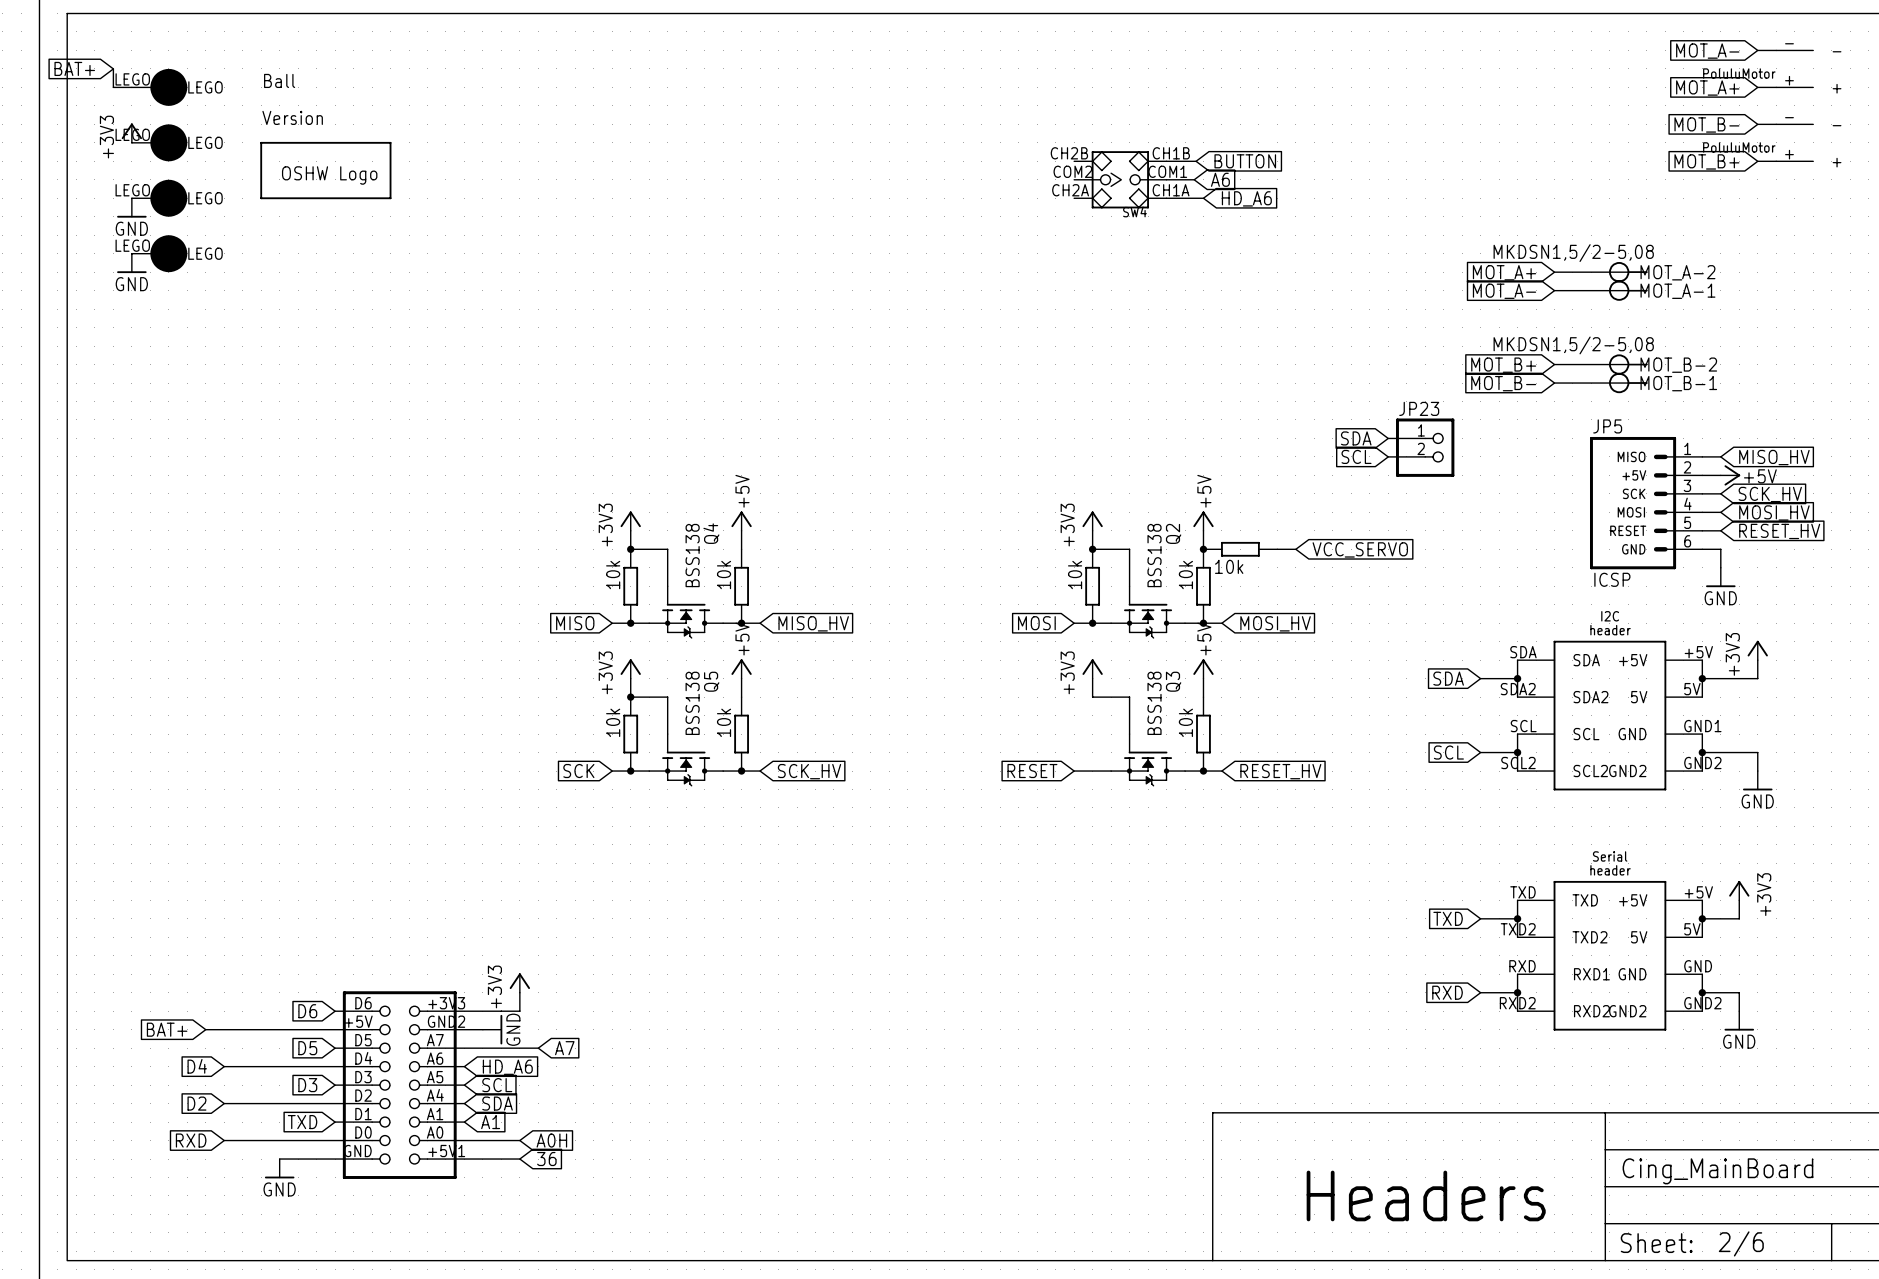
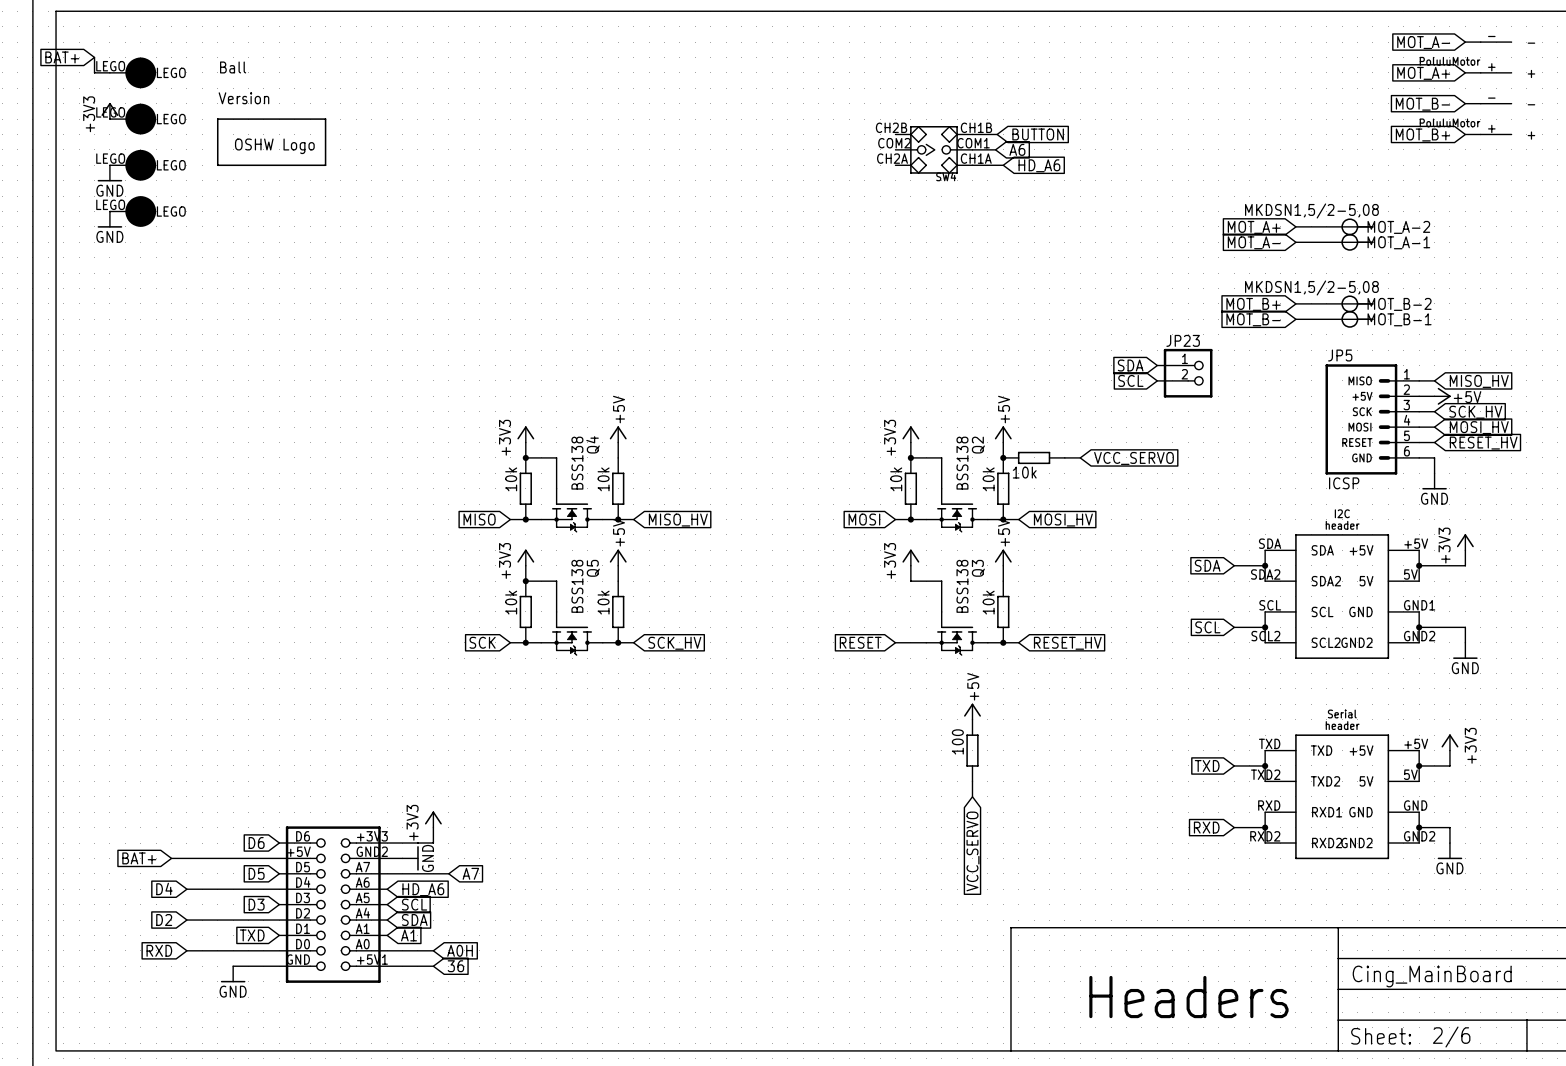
power symbol: none -> +5V (972, 711)
part: none -> 100 (972, 750)
wire: none -> (972, 781) (972, 796)
global label: none -> VCC_SERVO (972, 851)

